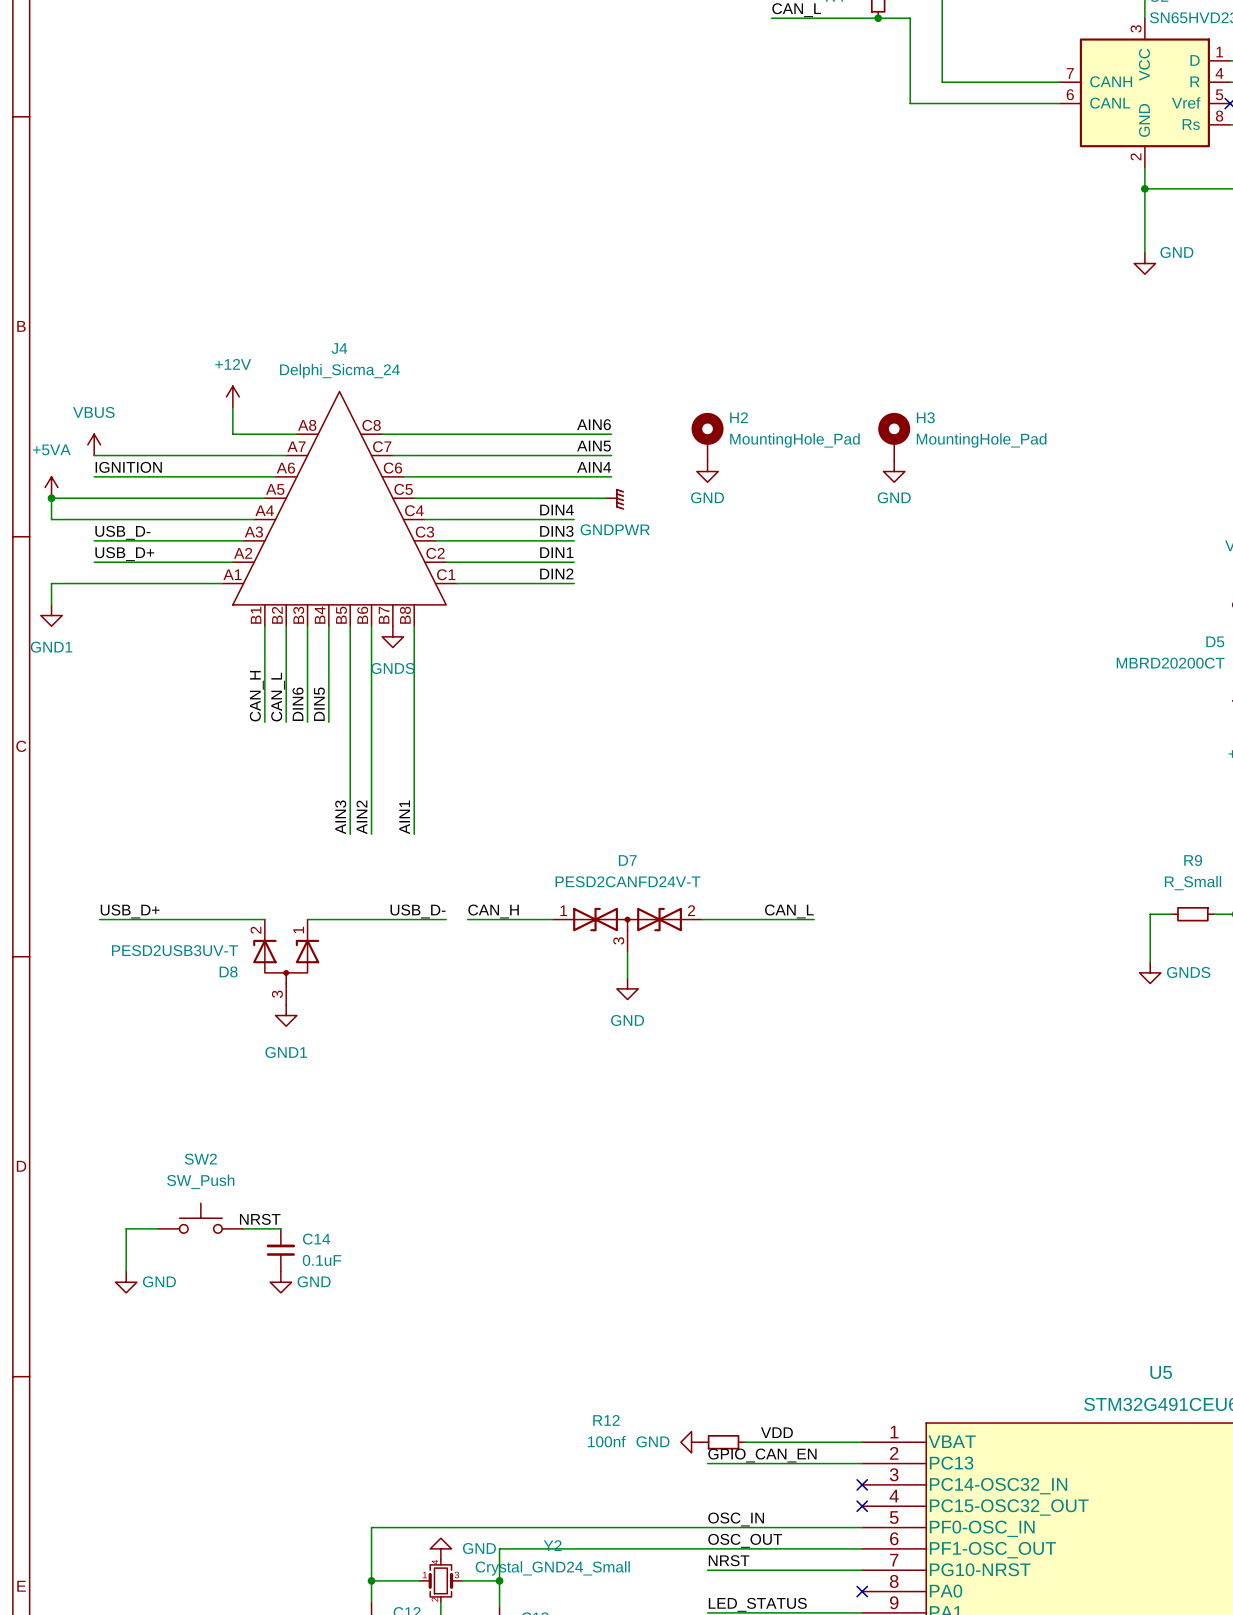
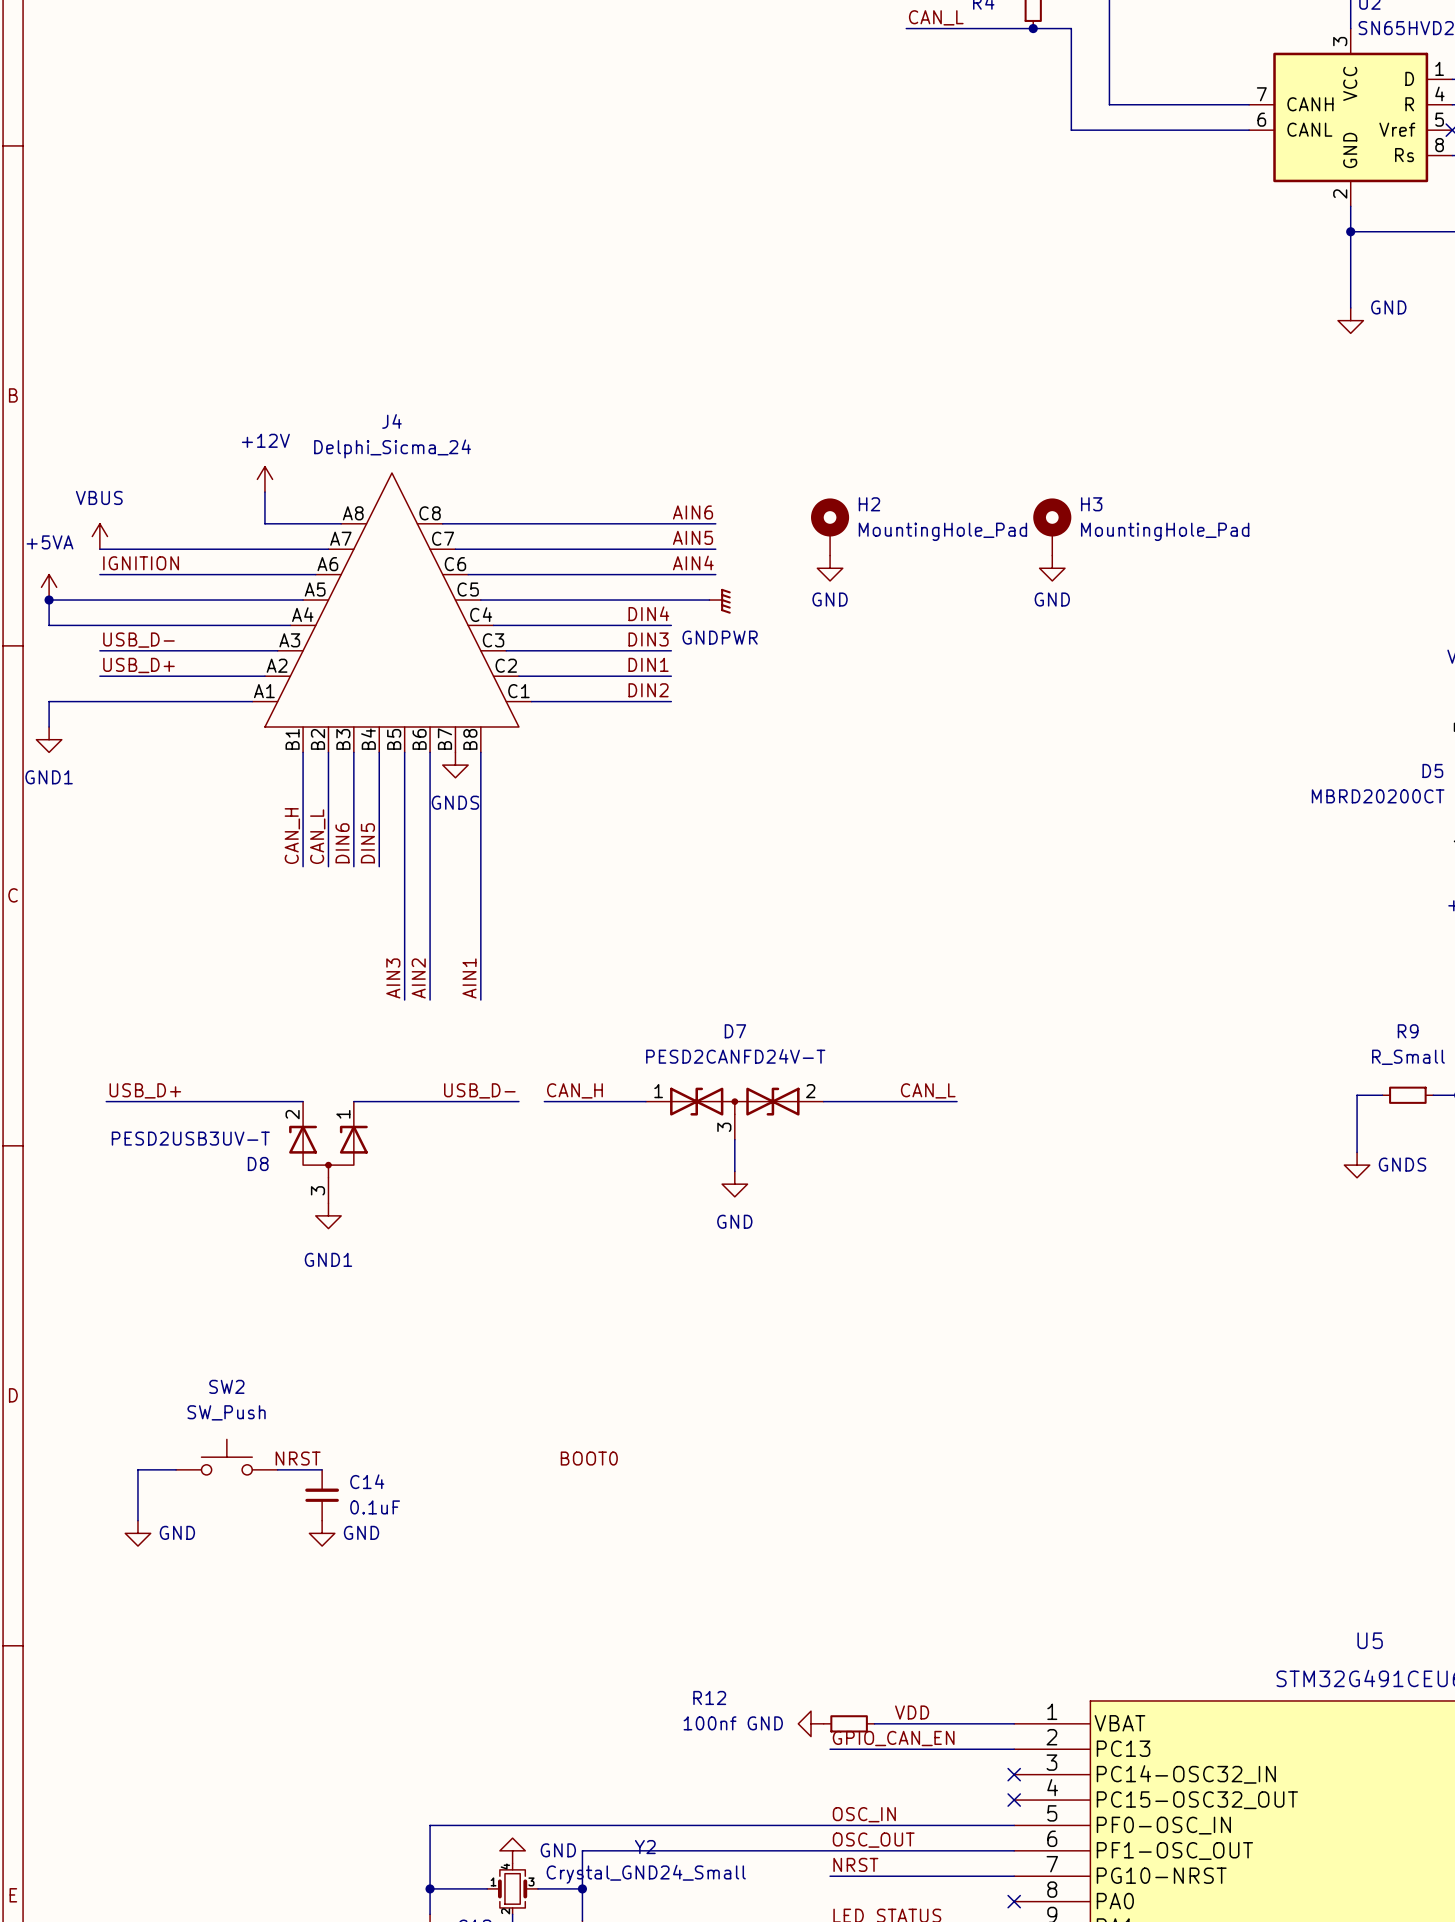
label: none -> BOOT0 (589, 1458)

